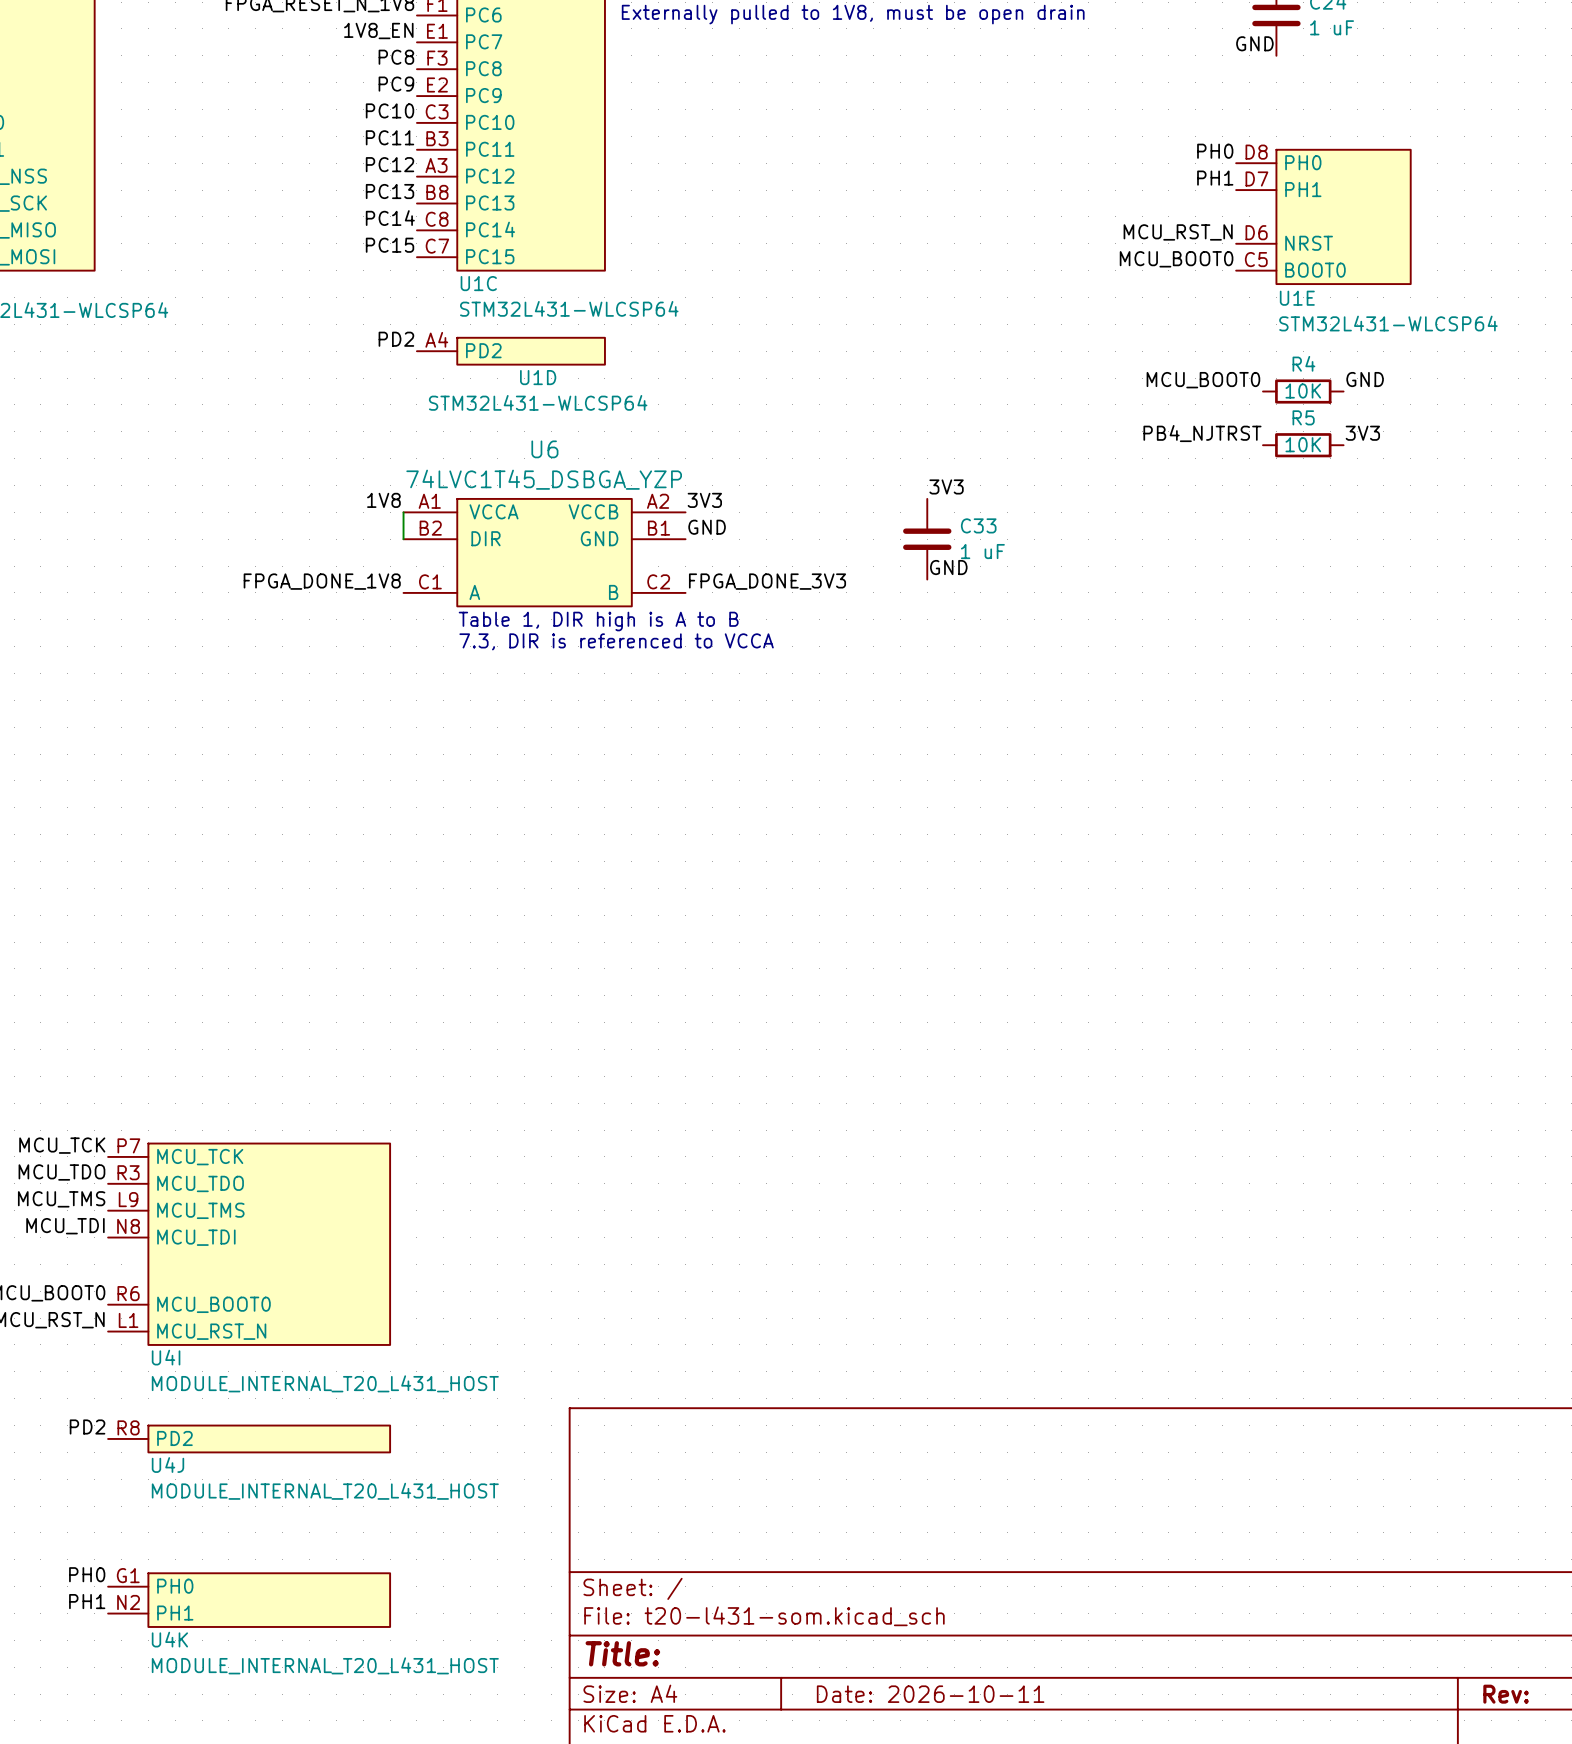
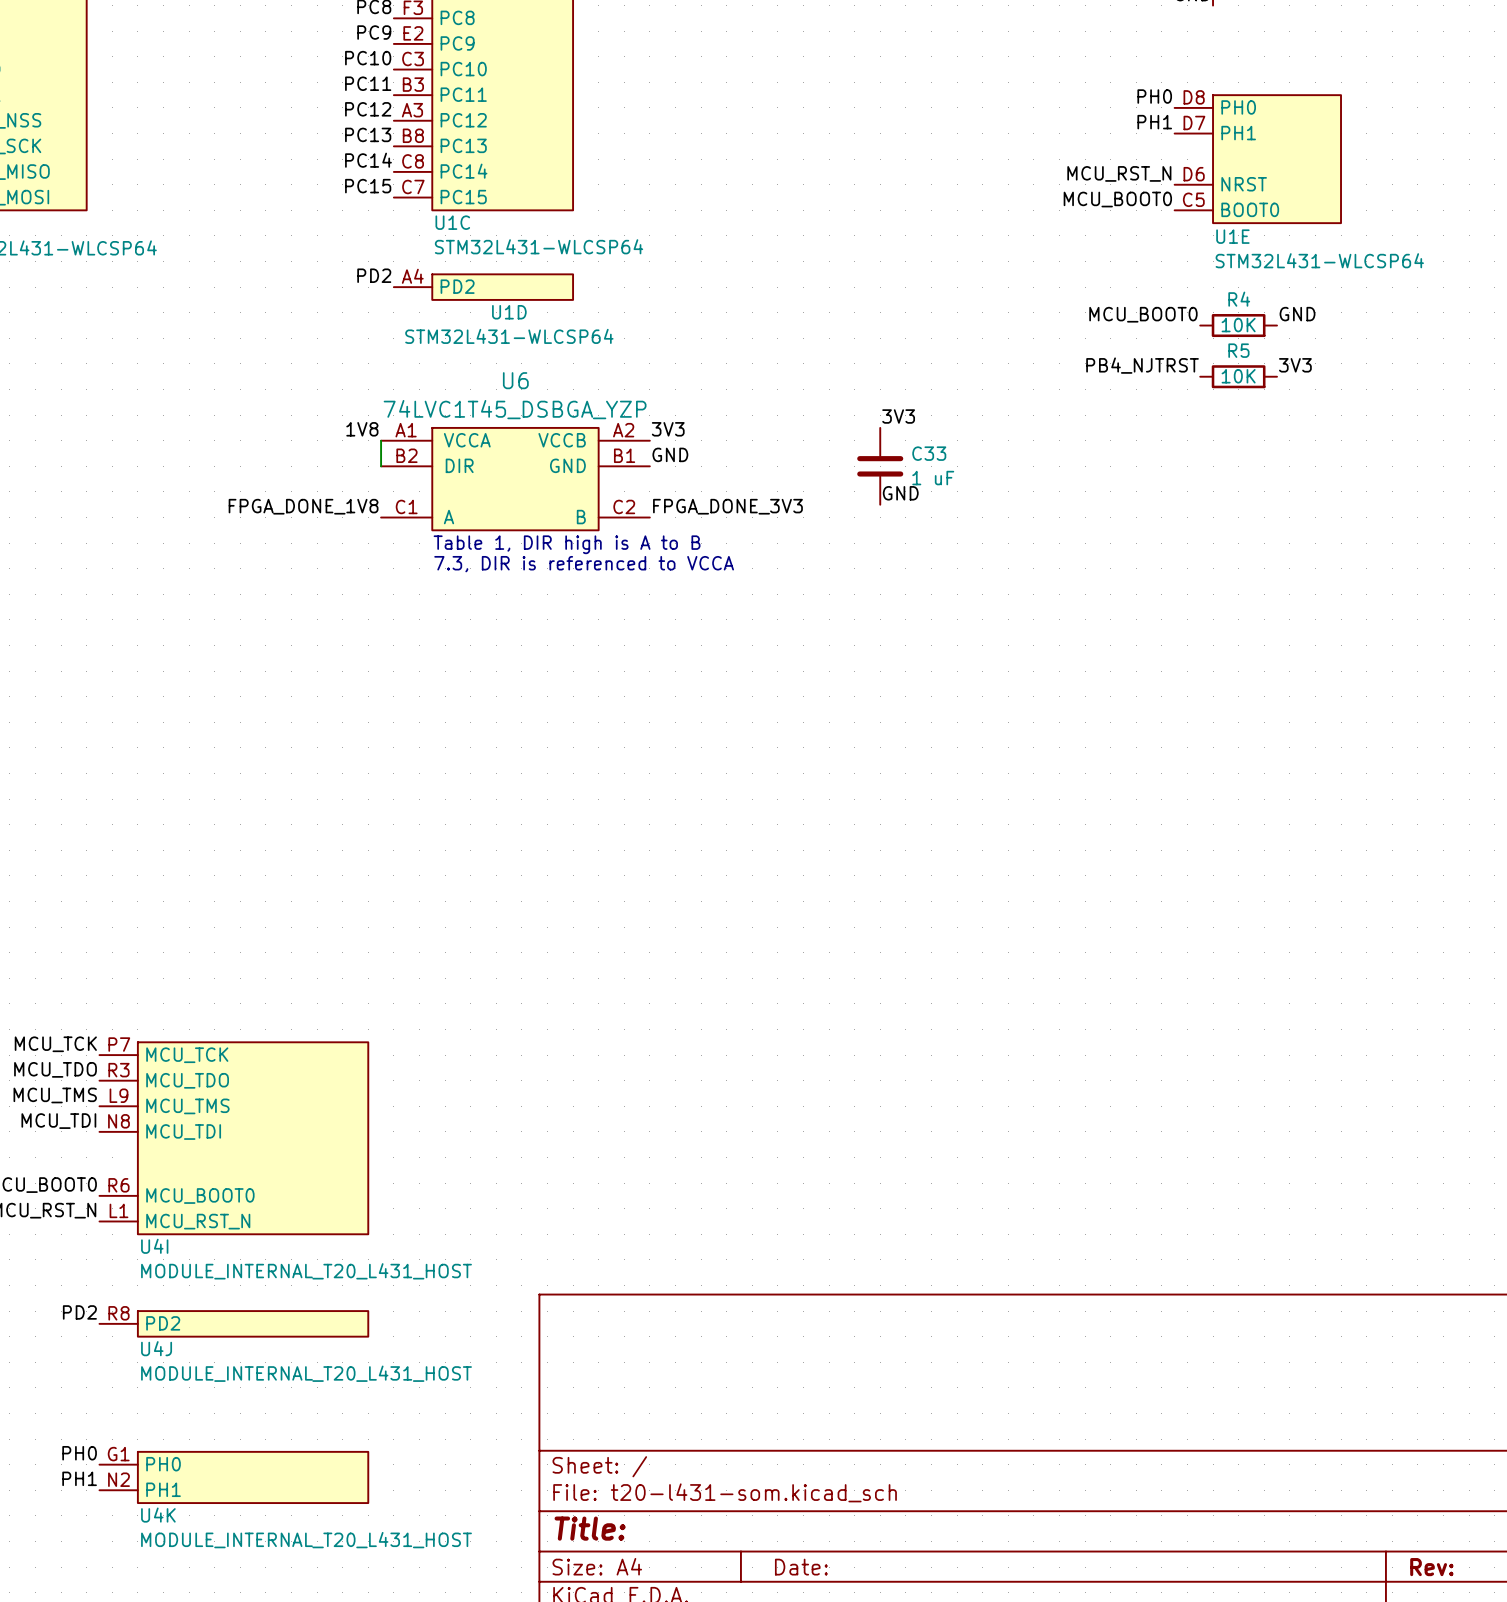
title block: Date: 2026-10-11 (930, 1694) -> Date: (801, 1567)

